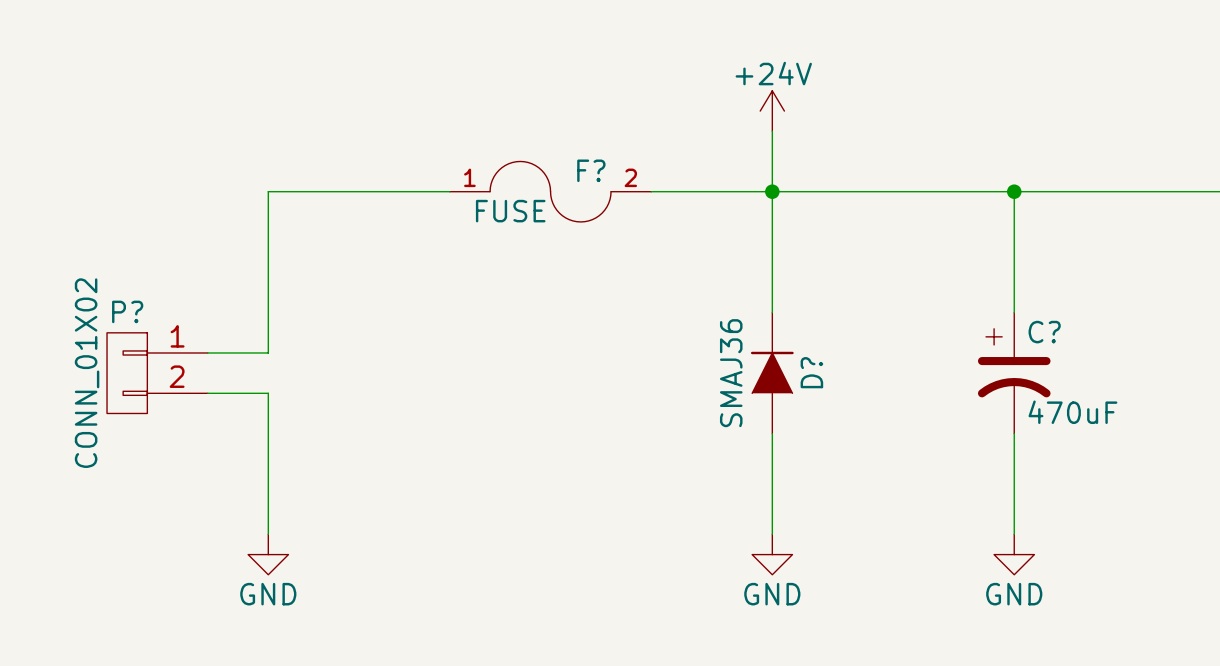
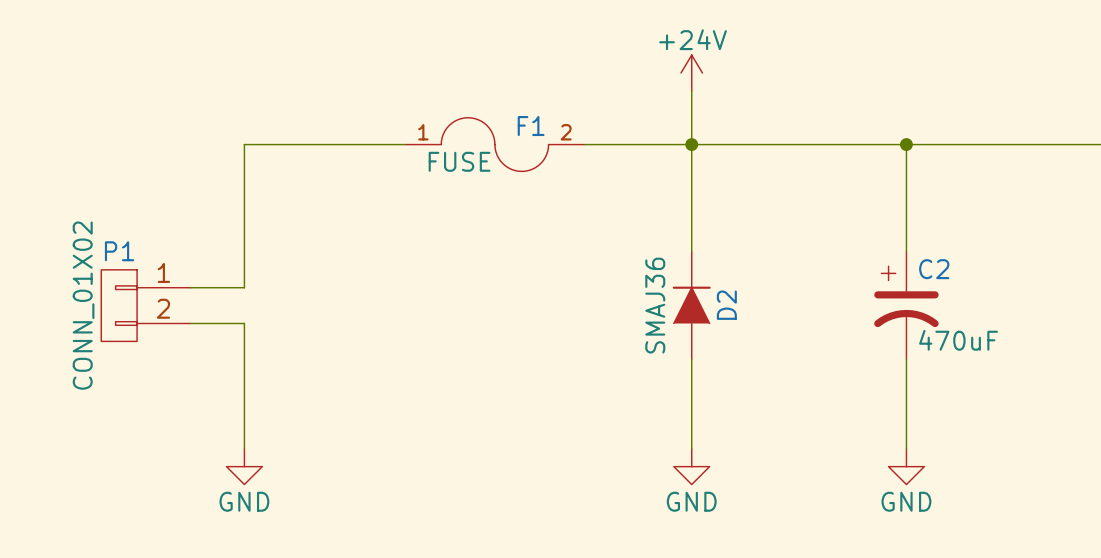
F? name: F? (591, 170) -> F1 (531, 126)
P? name: P? (127, 311) -> P1 (119, 251)
C? name: C? (1044, 332) -> C2 (934, 269)
D? name: D? (811, 372) -> D2 (726, 305)

